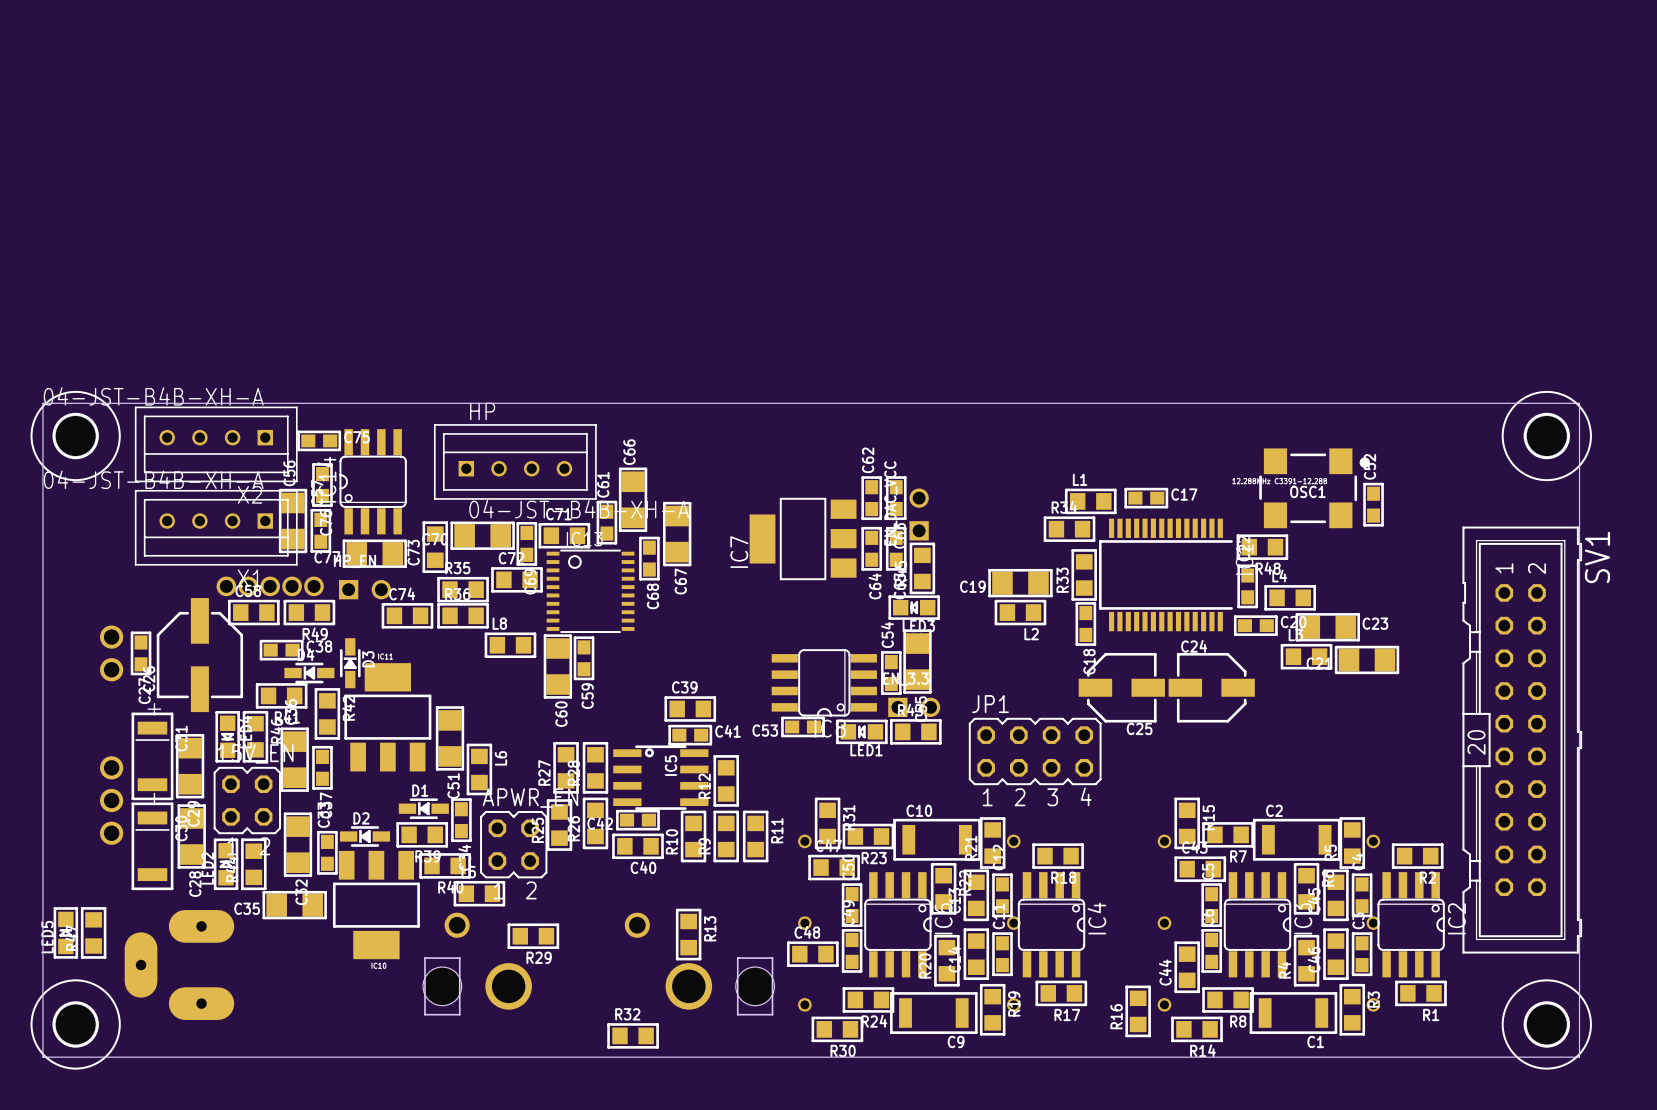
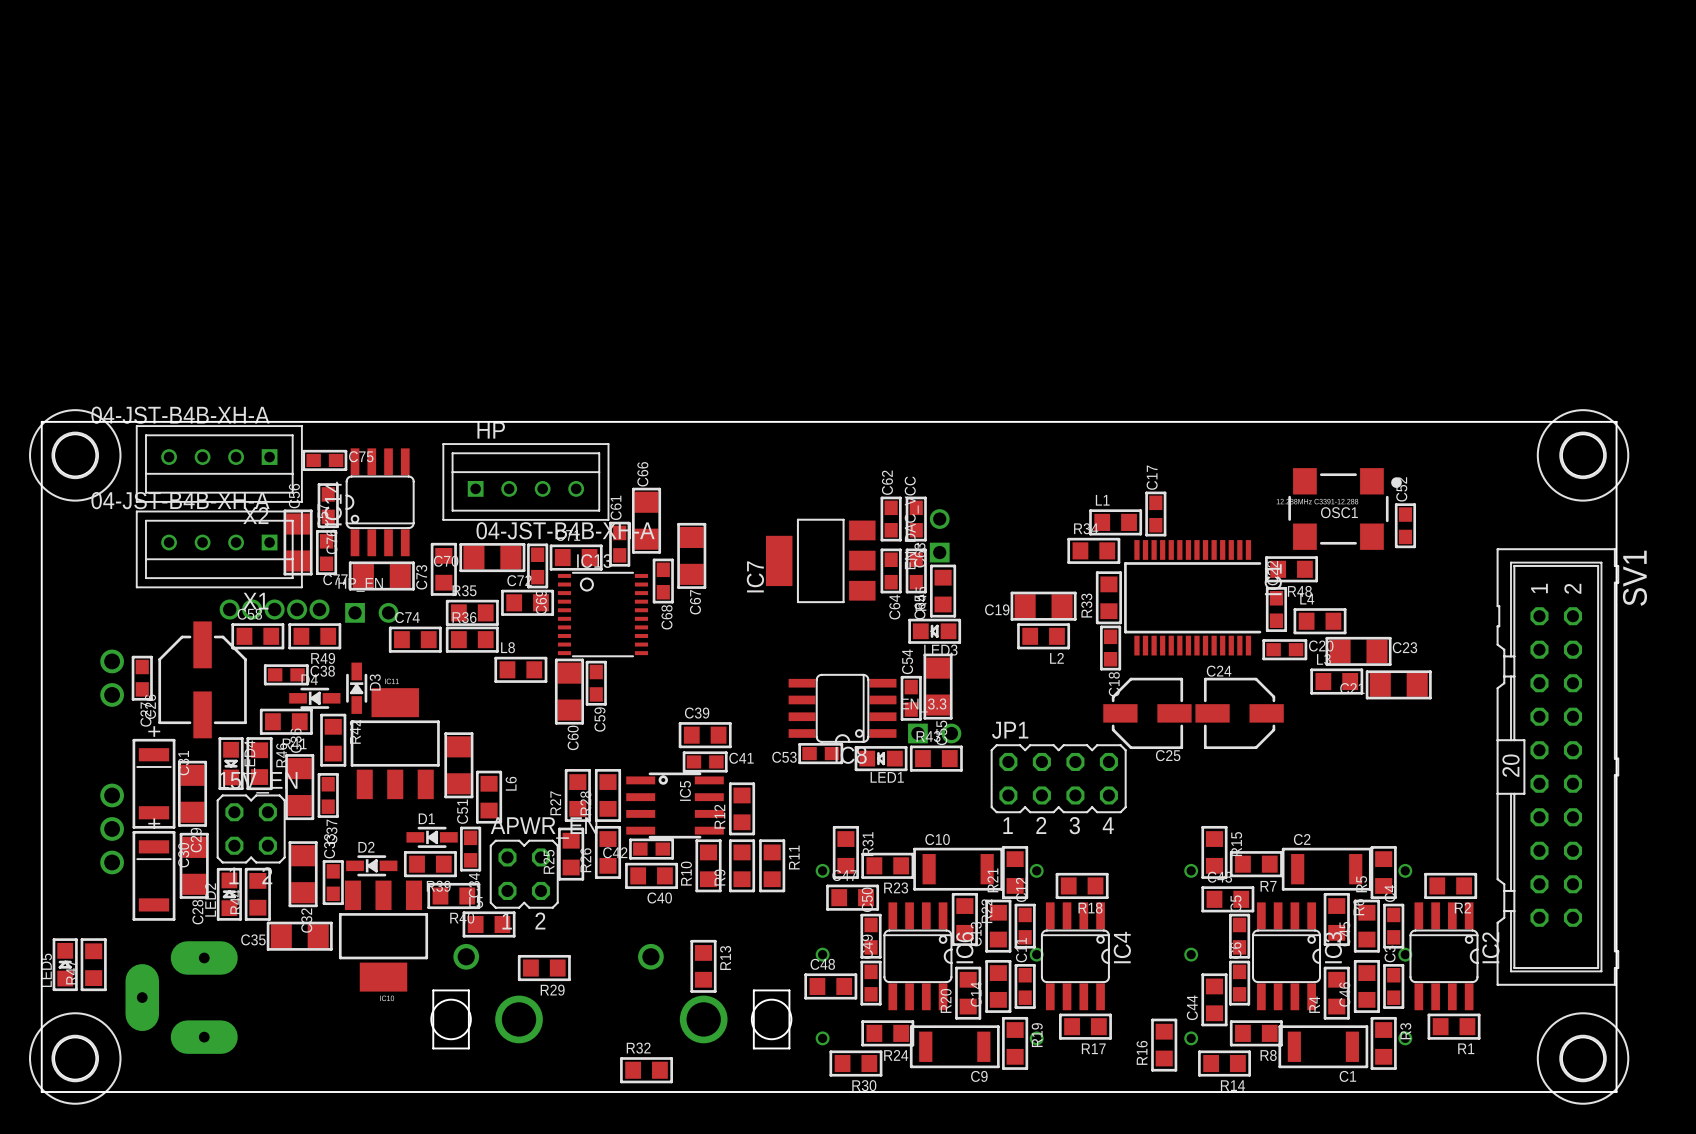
C17 name position: C17 (1184, 494) -> C17 (1152, 477)
C17 rotation: 0° (1146, 498) -> 90° clockwise (1155, 514)

